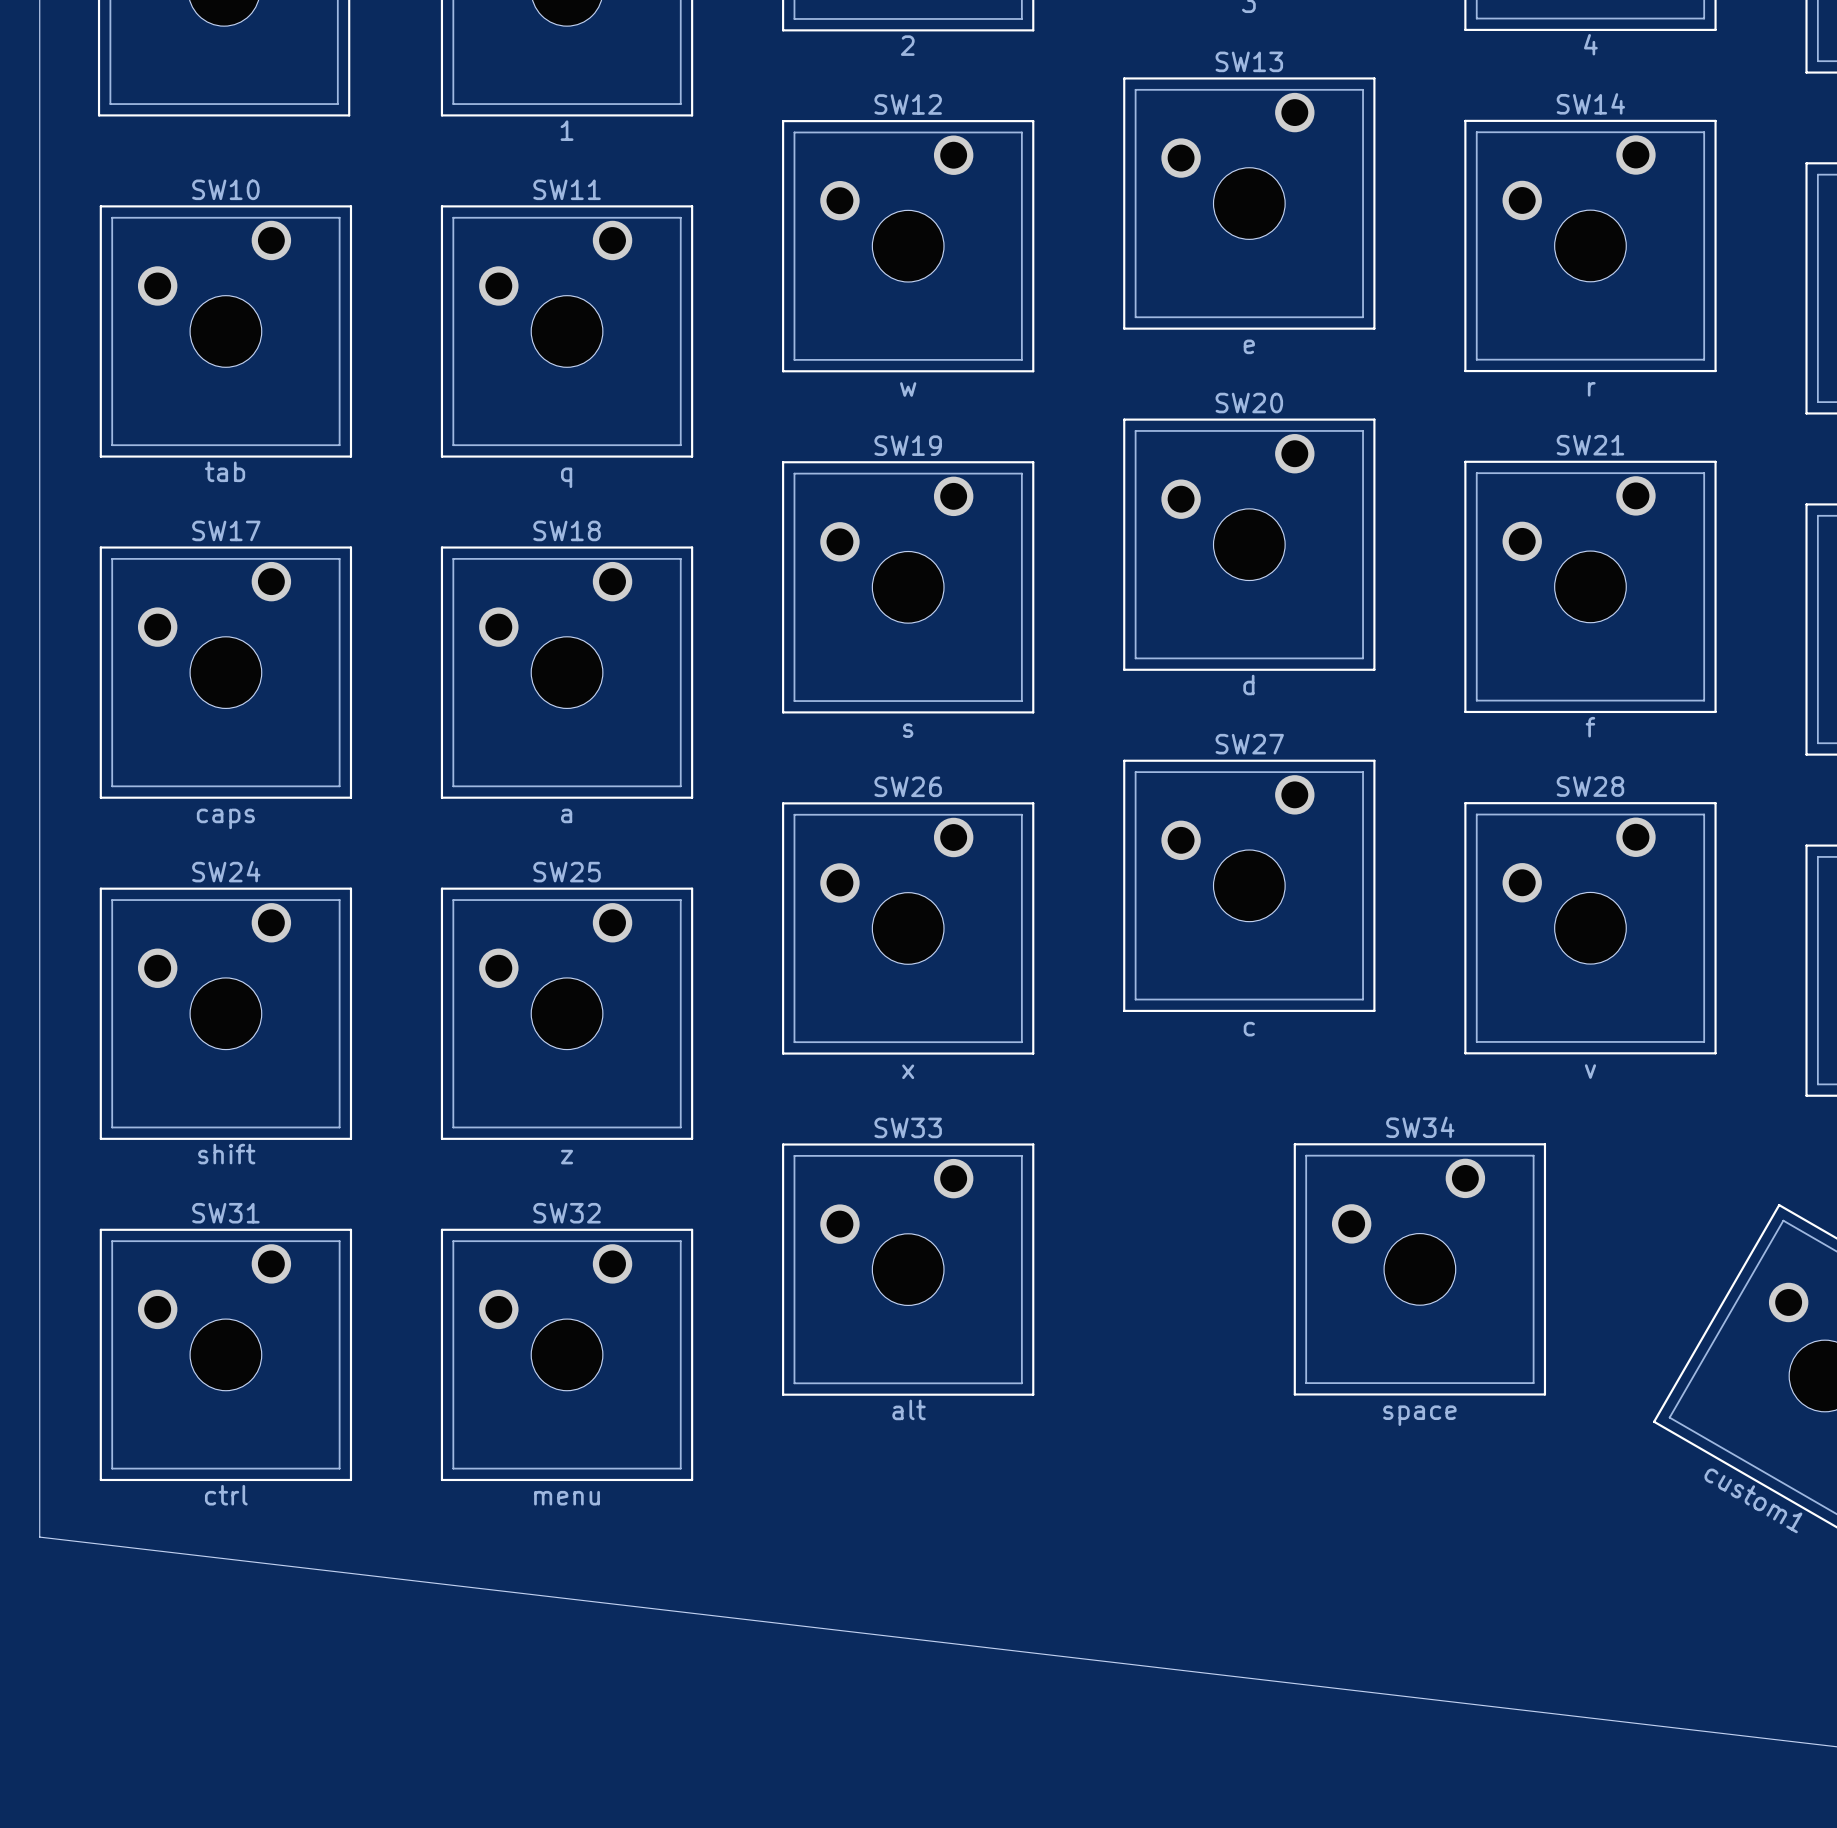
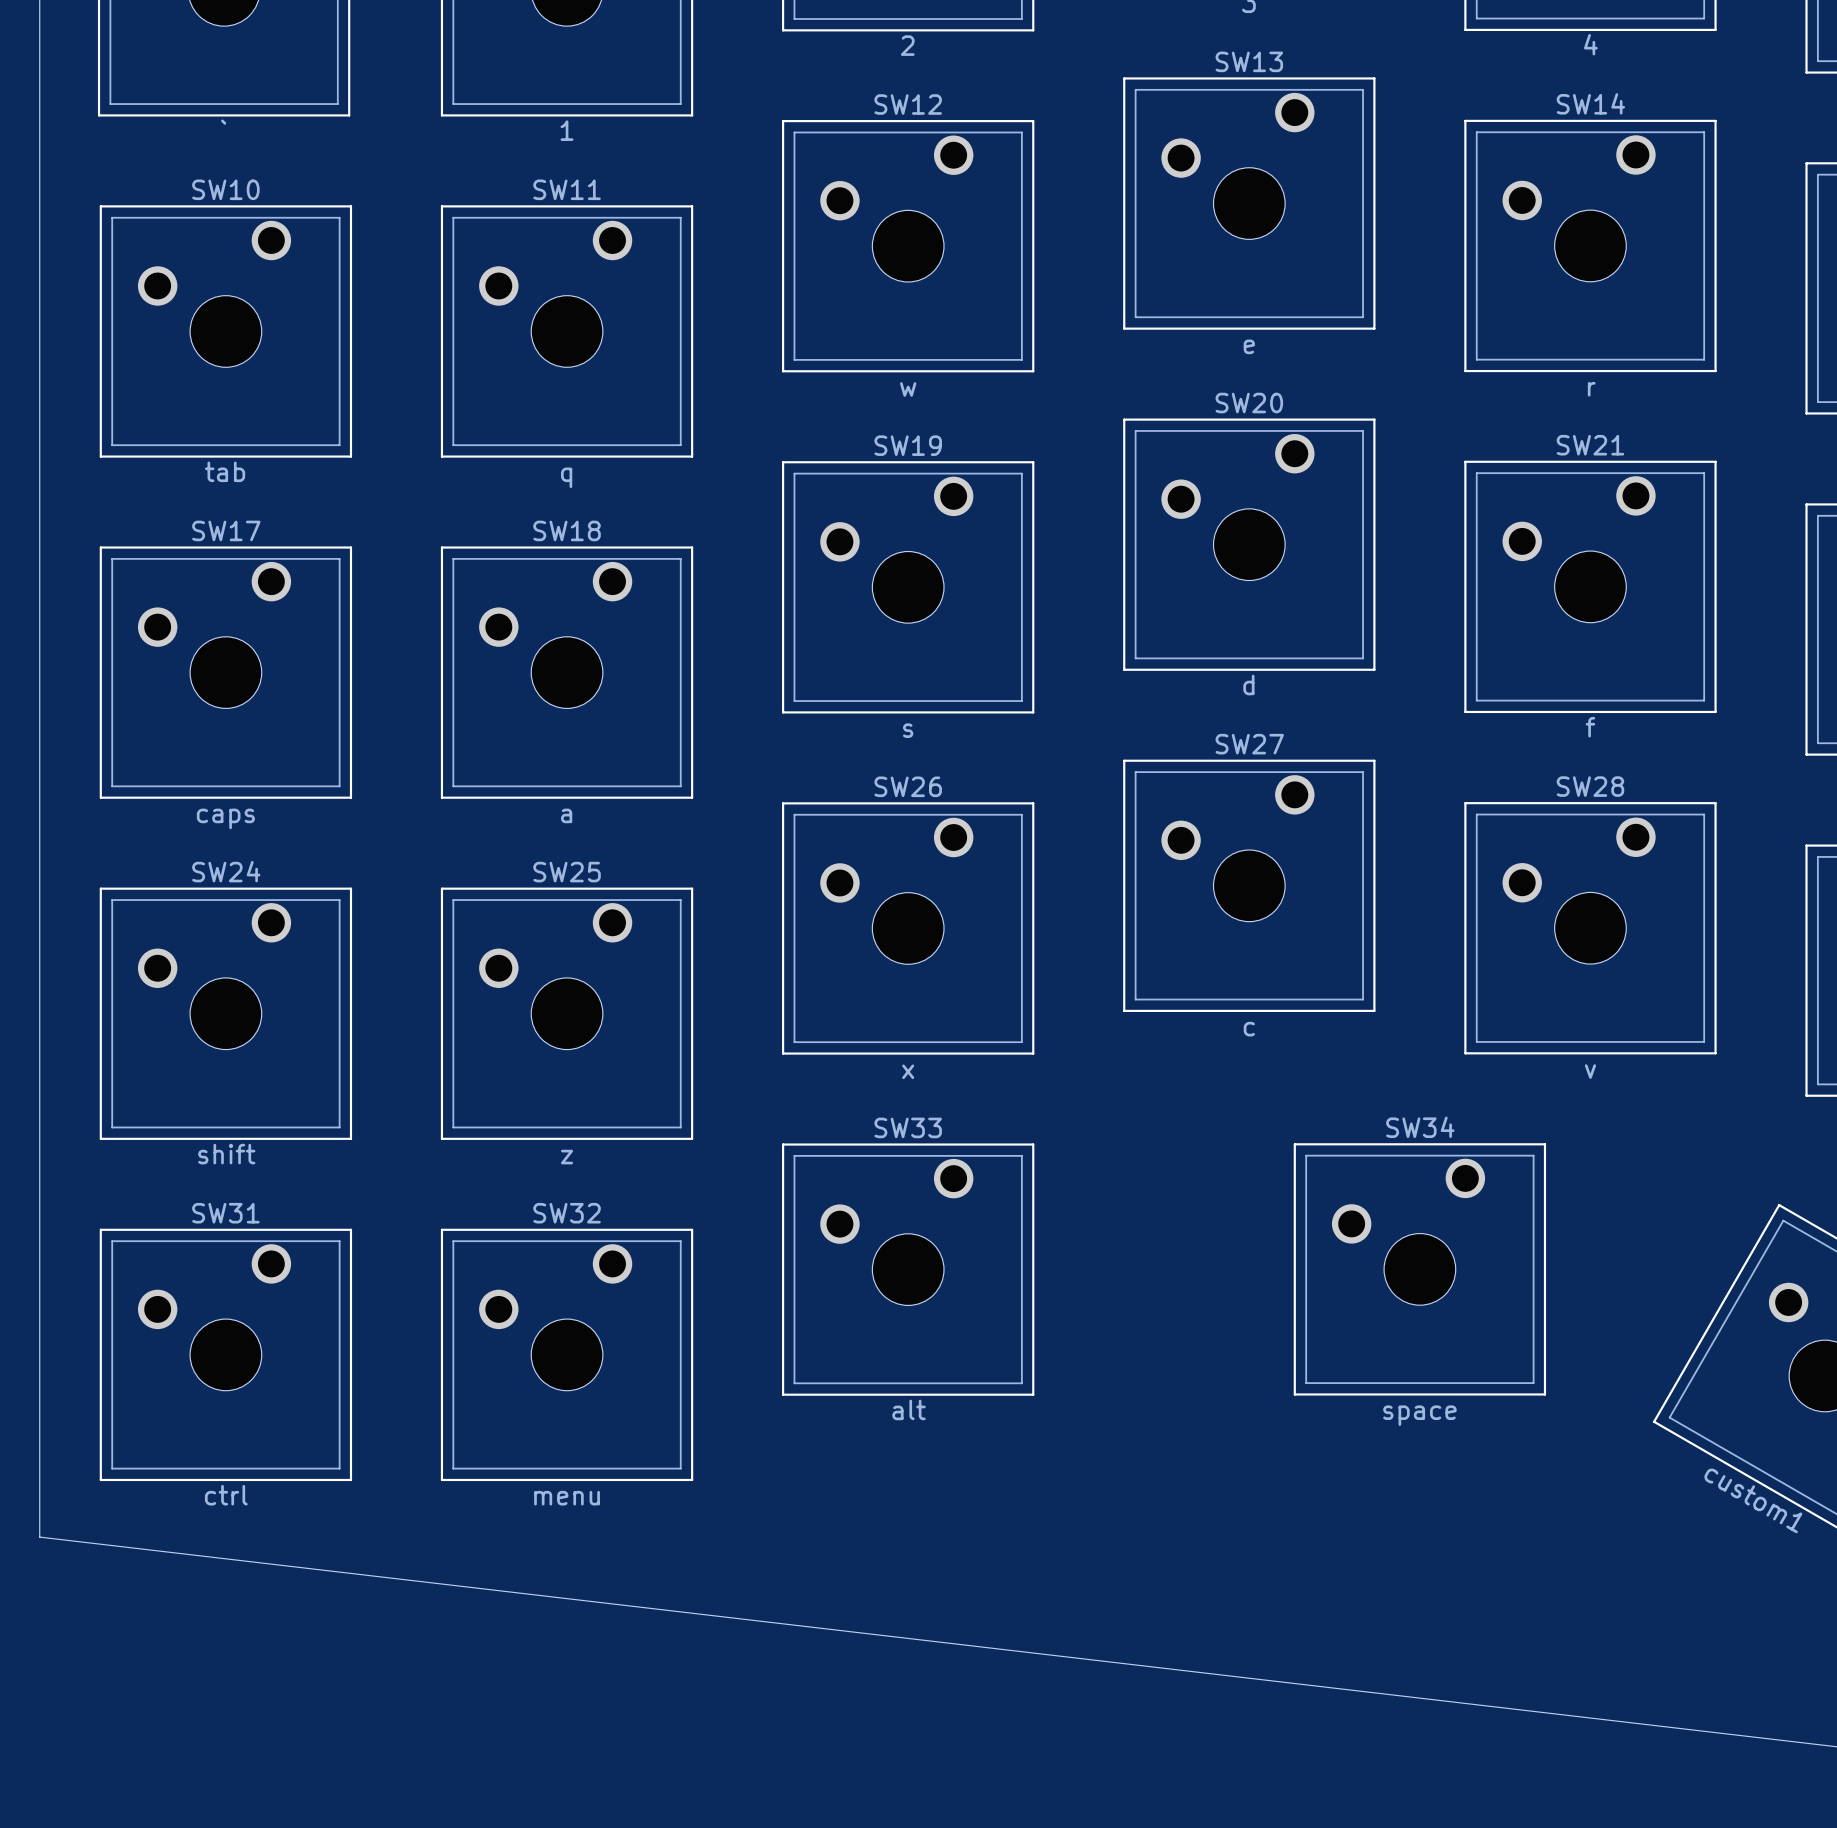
part value: none -> ` (223, 122)

